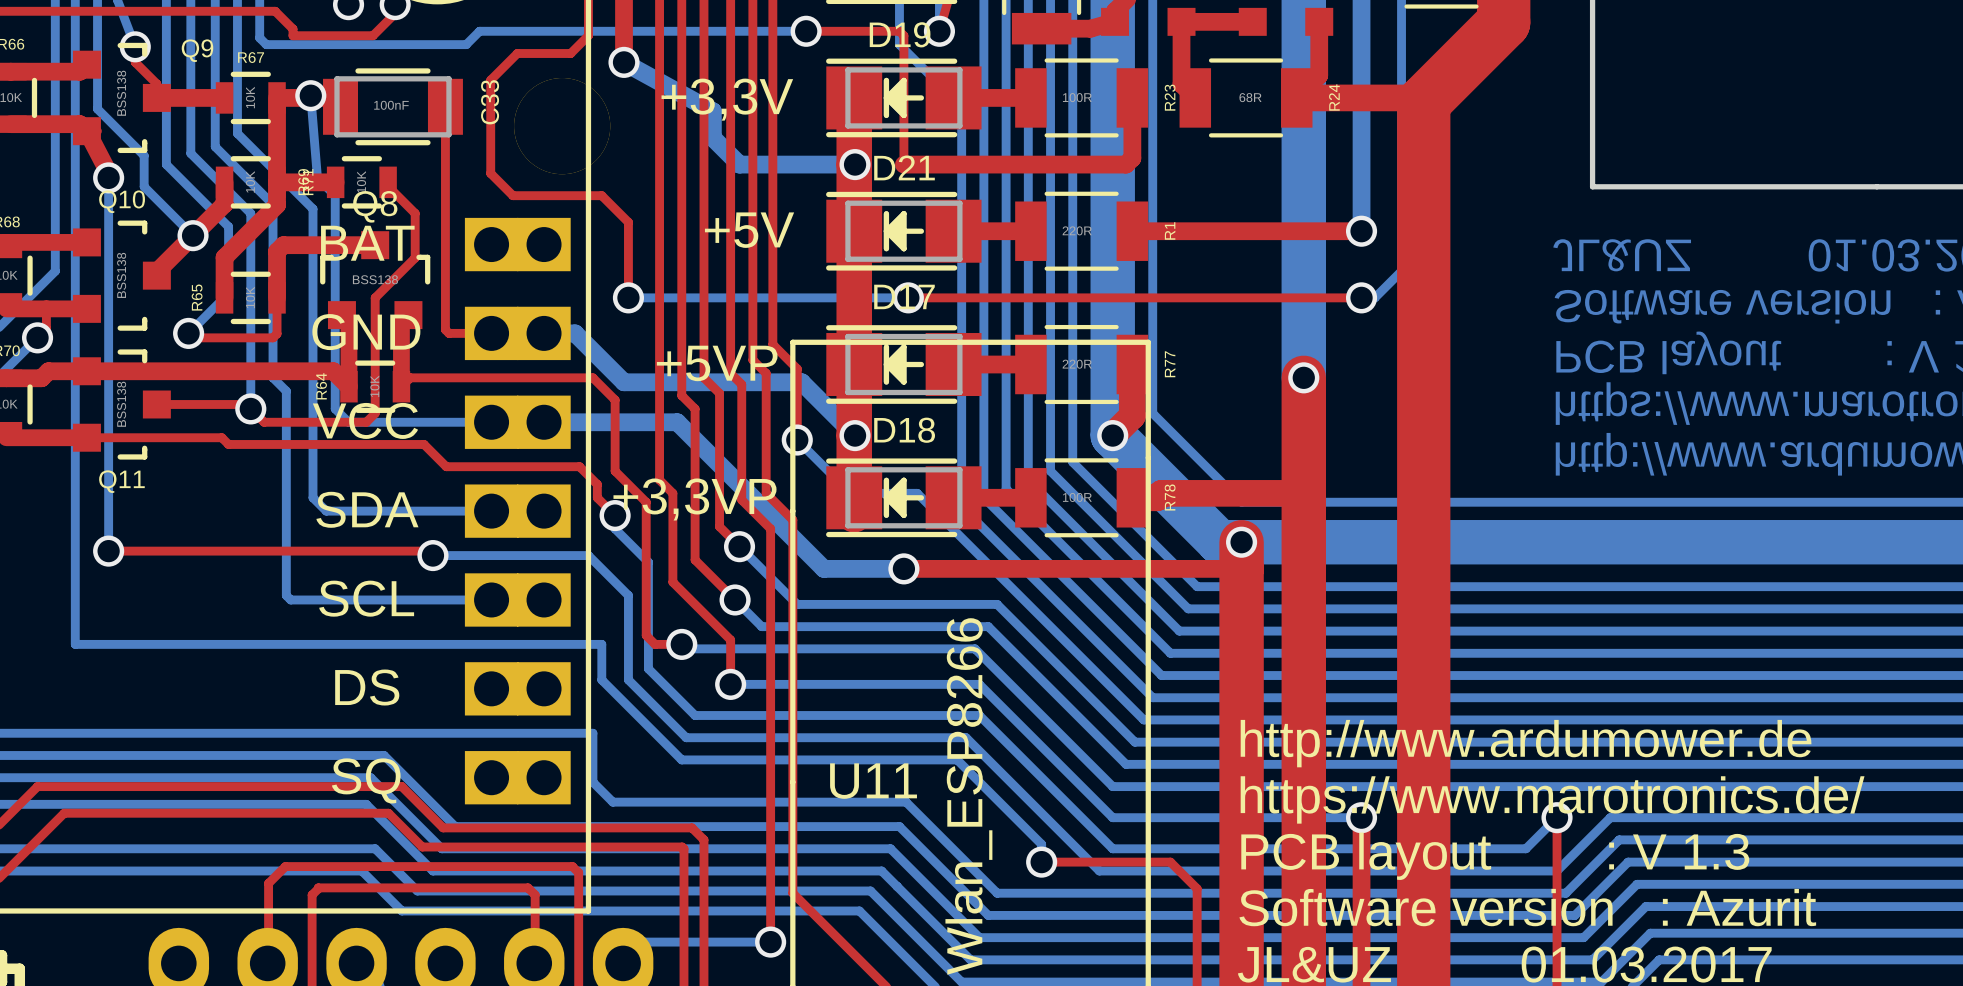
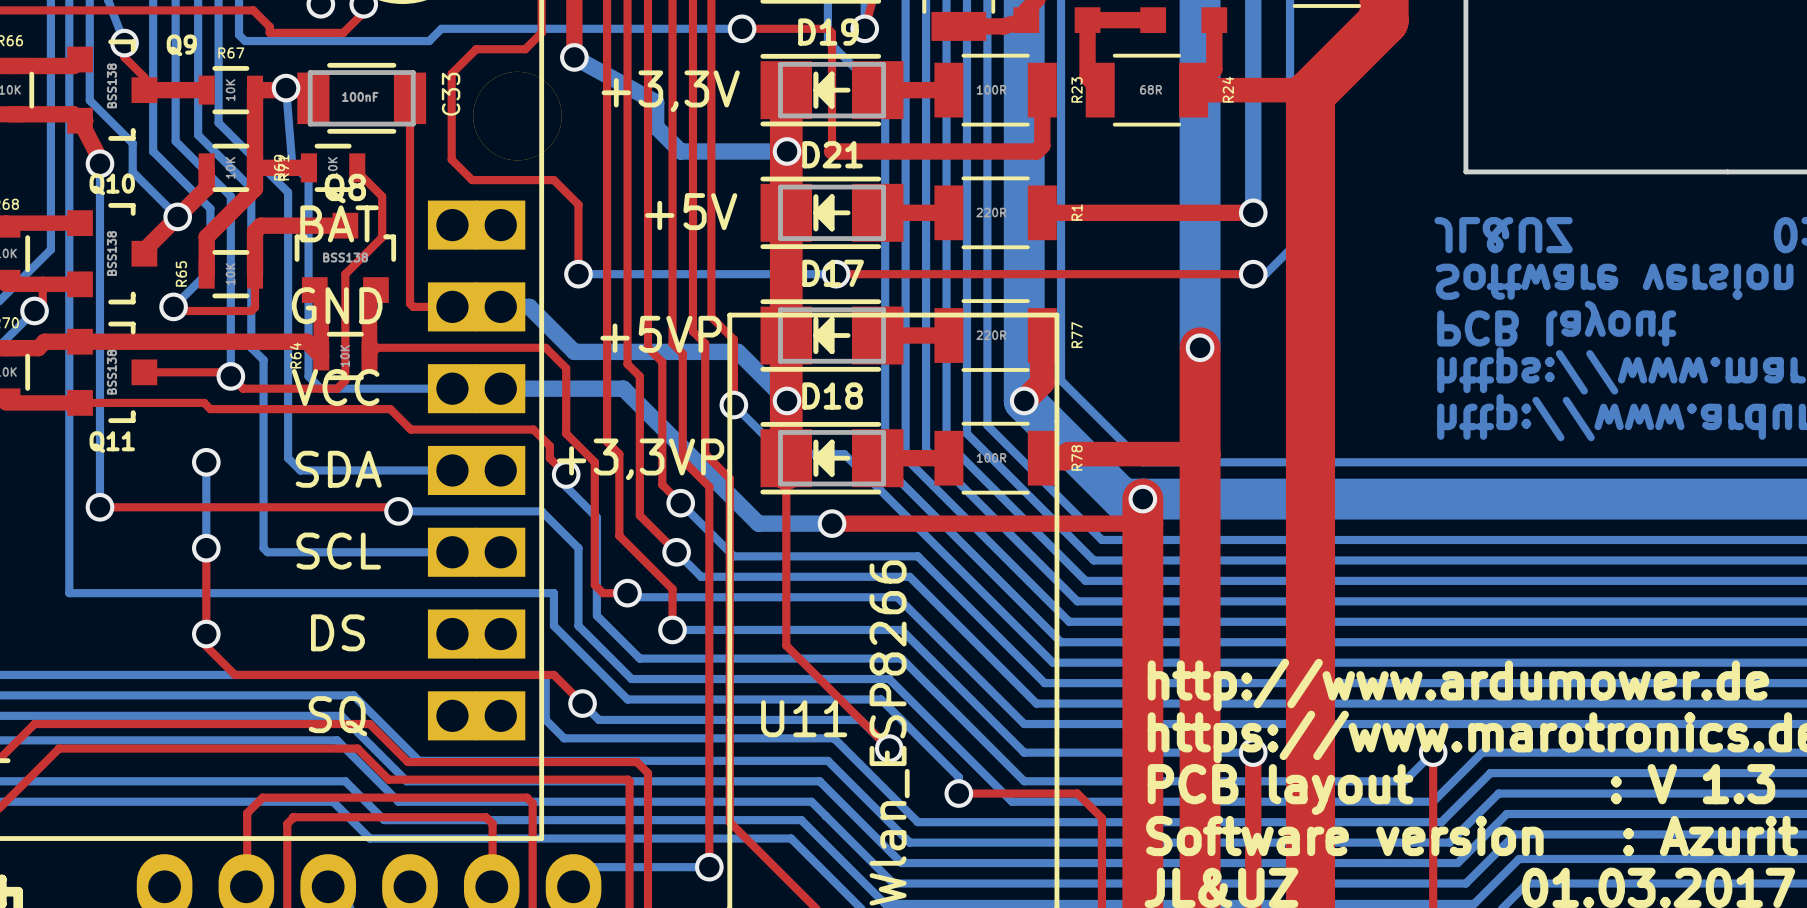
top track: none -> (786, 458) (786, 645) (889, 748)
bottom track: none -> (206, 462) (206, 548)
via: none -> (206, 462)
top track: none -> (206, 548) (206, 646) (234, 674) (553, 674) (582, 703)
via: none -> (206, 548)
via: none -> (206, 634)
bottom track: none -> (582, 703) (598, 719) (860, 719) (889, 748)
via: none -> (582, 703)
via: none -> (889, 748)

